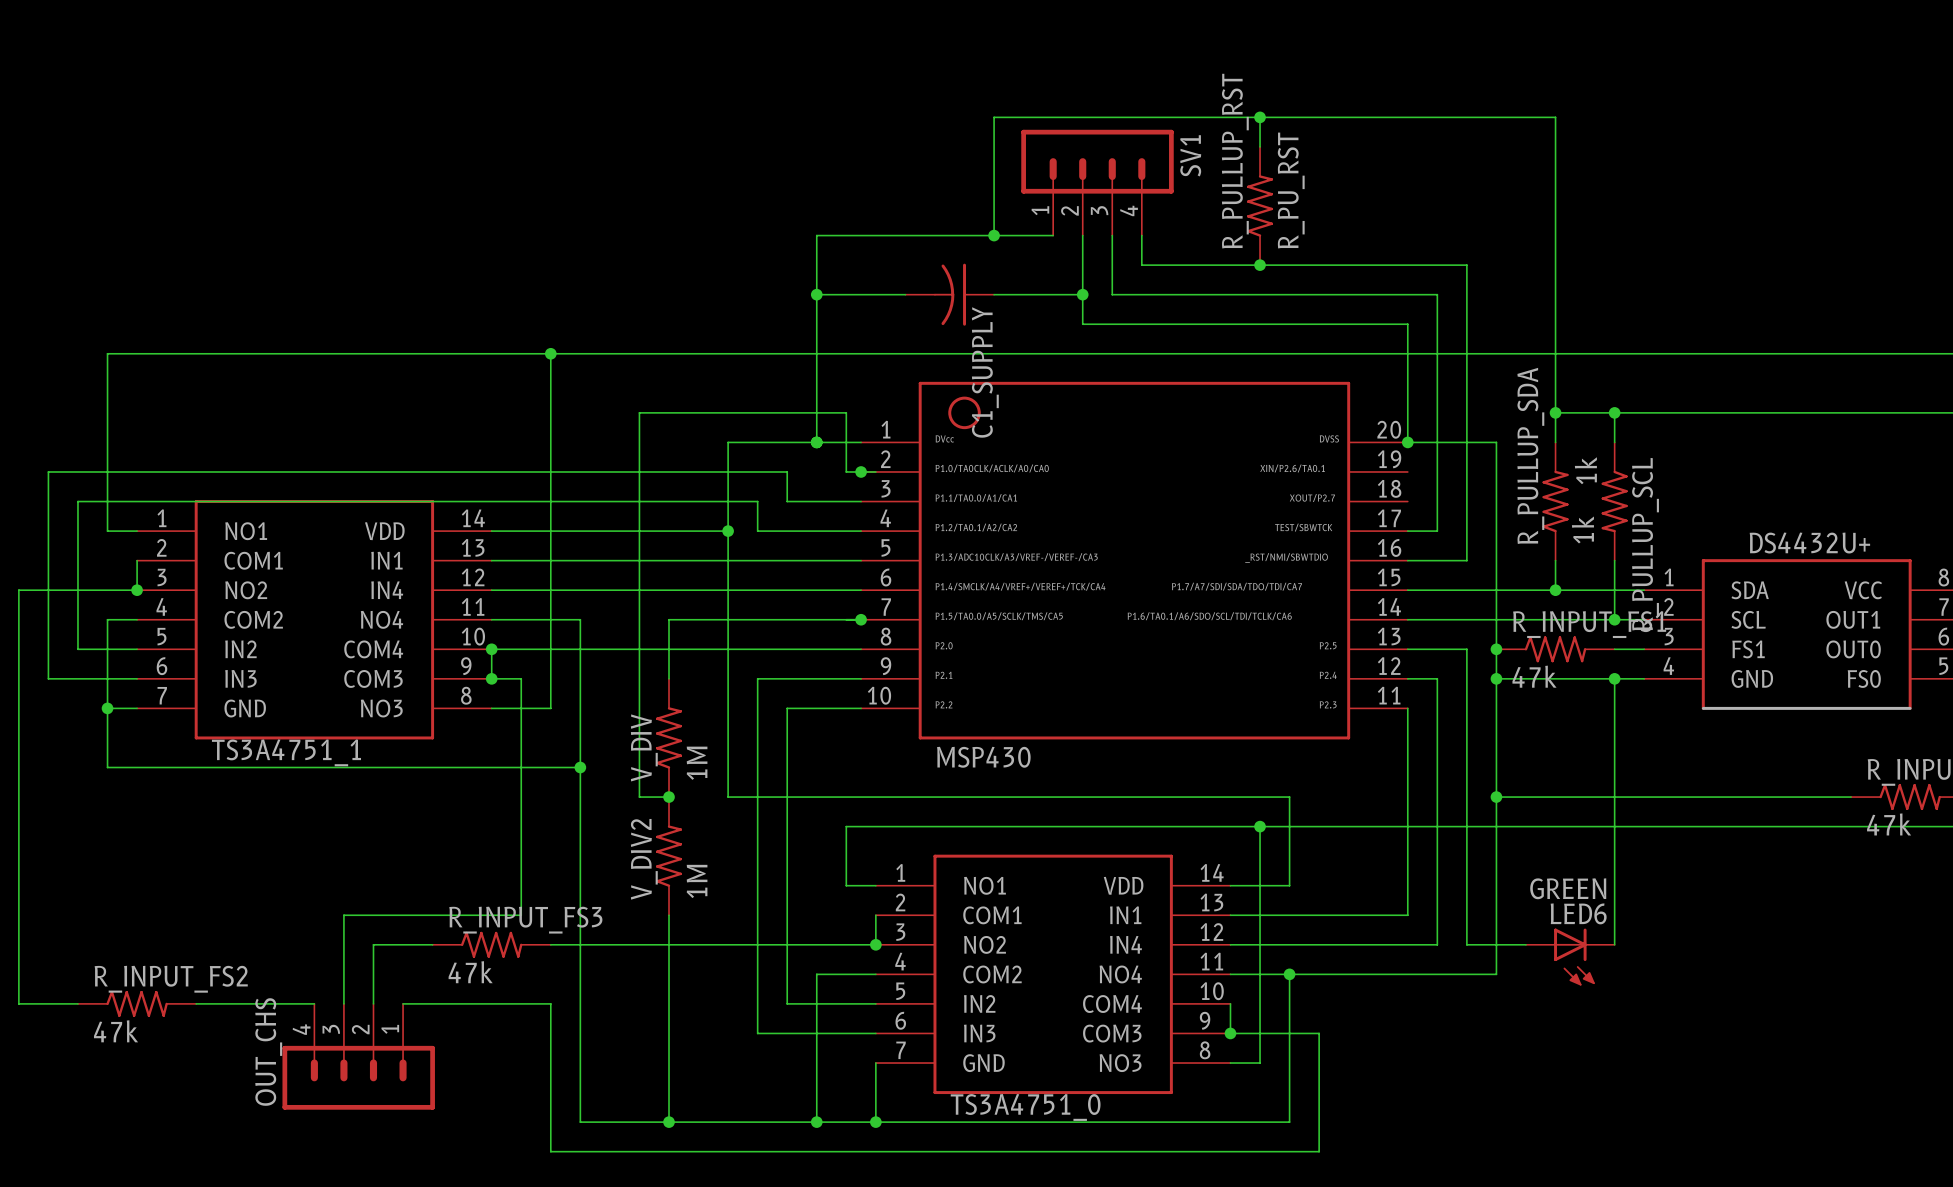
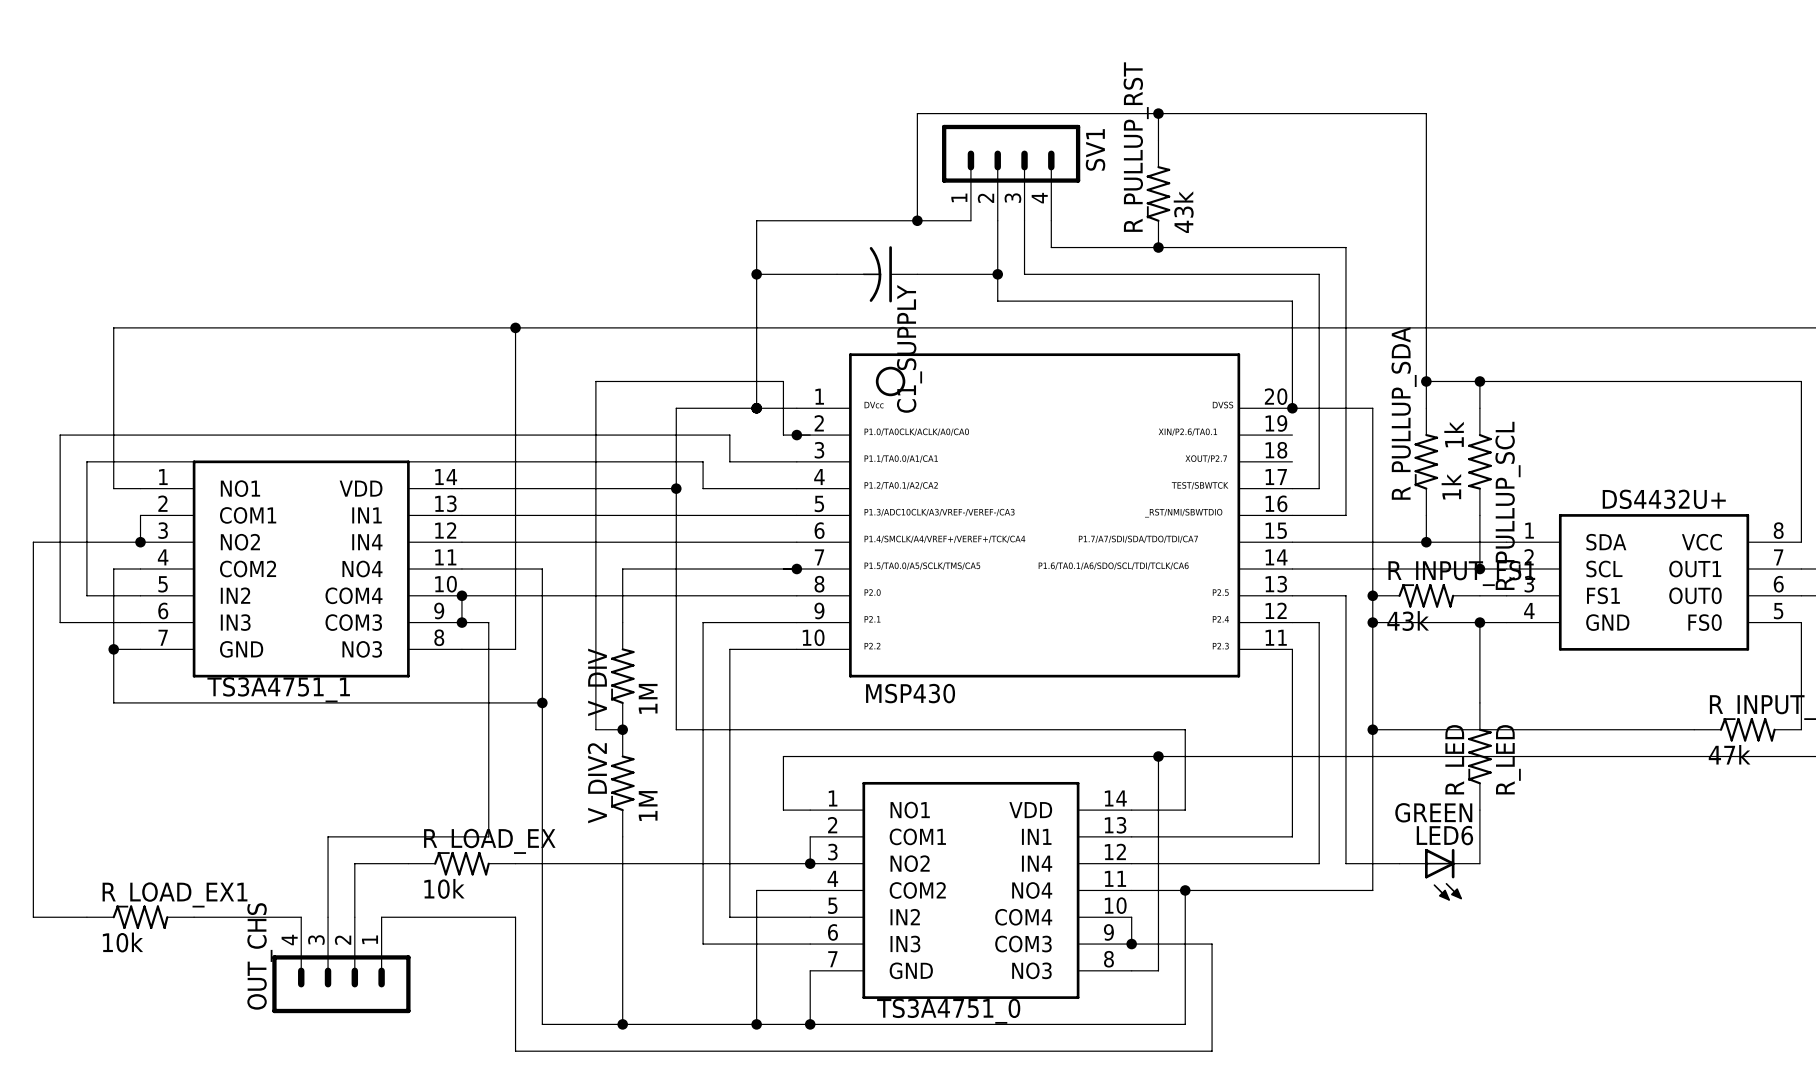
R_PULLUP_RST value: R_PU_RST (1291, 190) -> 43k (1183, 212)
R_INPUT_FS1 value: 47k (1534, 676) -> 43k (1408, 621)
R_LED: none -> R_LED (1479, 756)
R_INPUT_FS3 name: R_INPUT_FS3 (525, 920) -> R_LOAD_EX (489, 841)
R_INPUT_FS3 value: 47k (470, 972) -> 10k (444, 888)
R_INPUT_FS2 name: R_INPUT_FS2 (171, 979) -> R_LOAD_EX1 (175, 894)
R_INPUT_FS2 value: 47k (116, 1031) -> 10k (122, 942)

